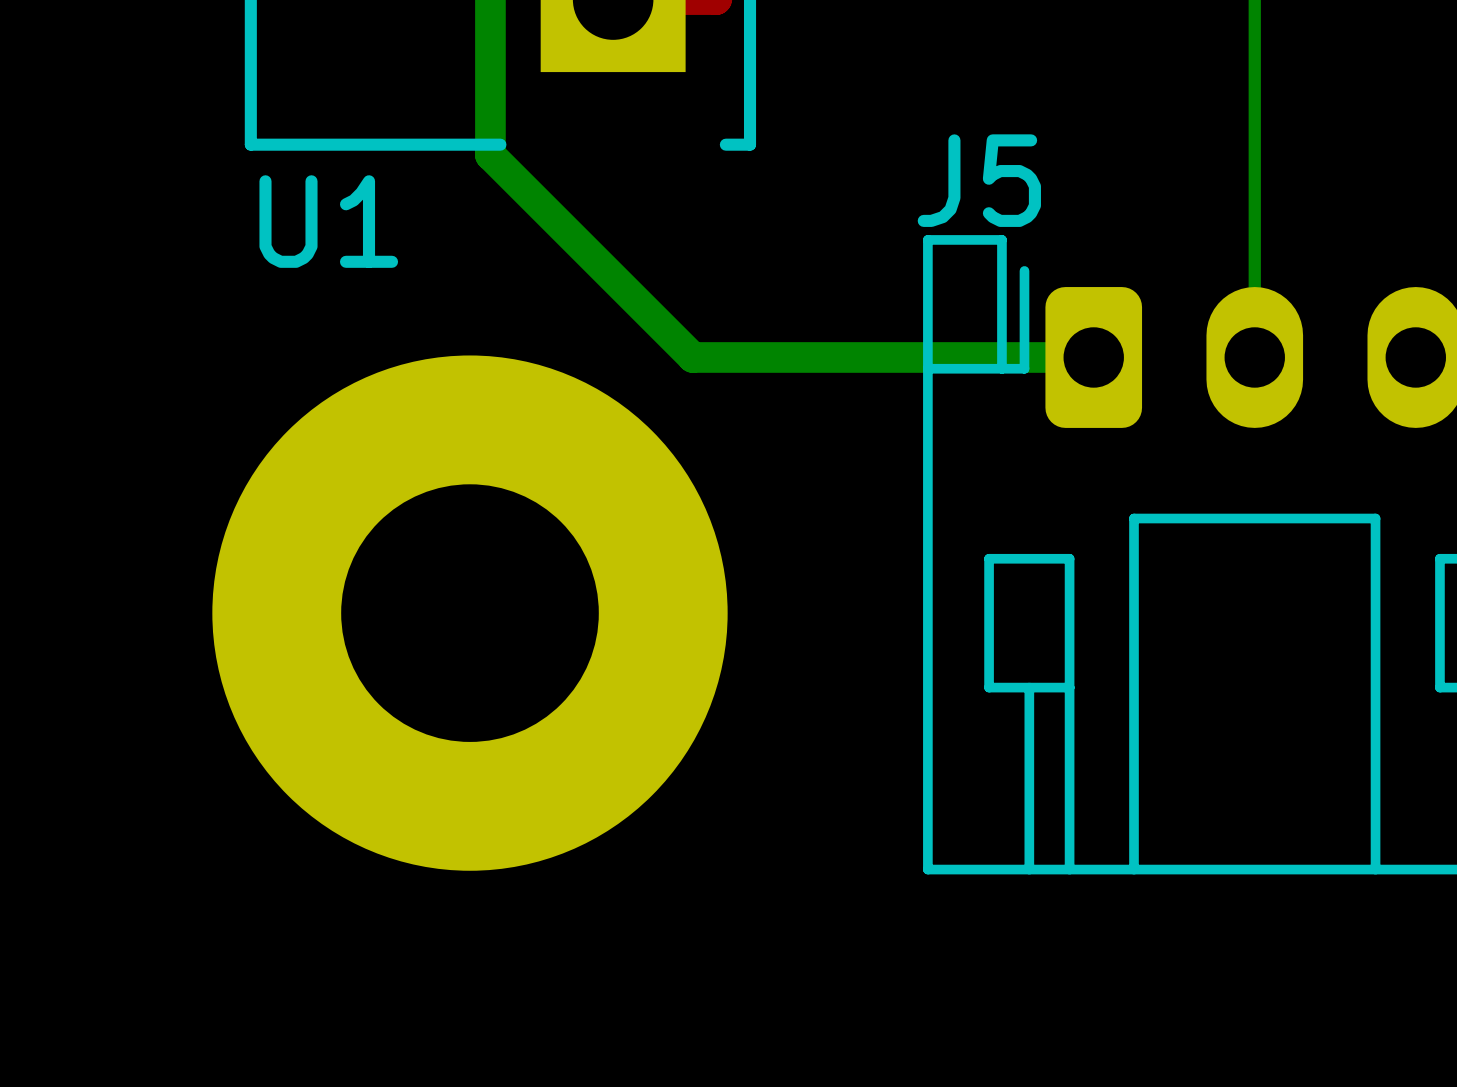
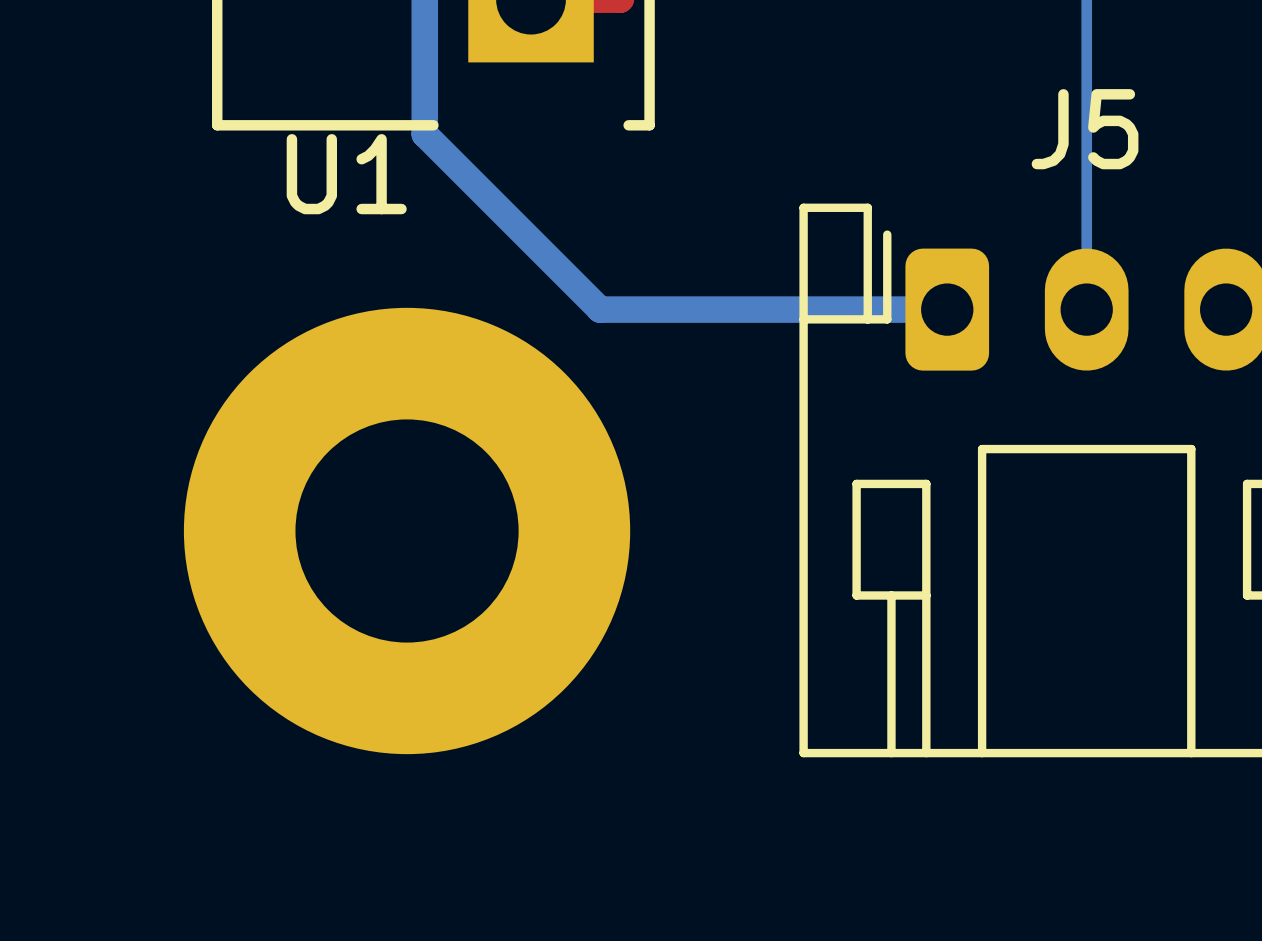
J5 name position: J5 (979, 180) -> J5 (1085, 129)
U1 name position: U1 (328, 221) -> U1 (346, 174)

